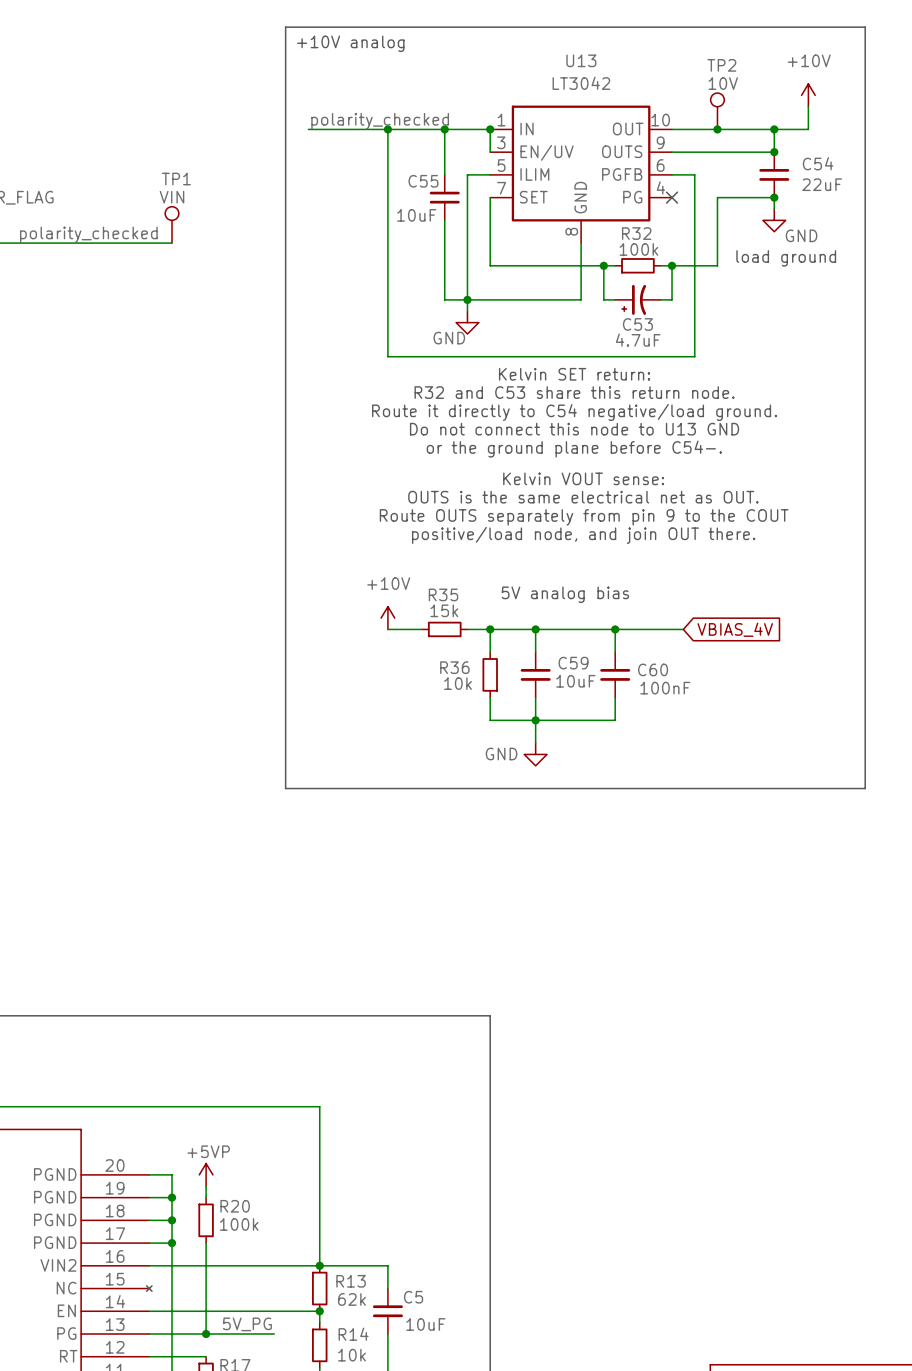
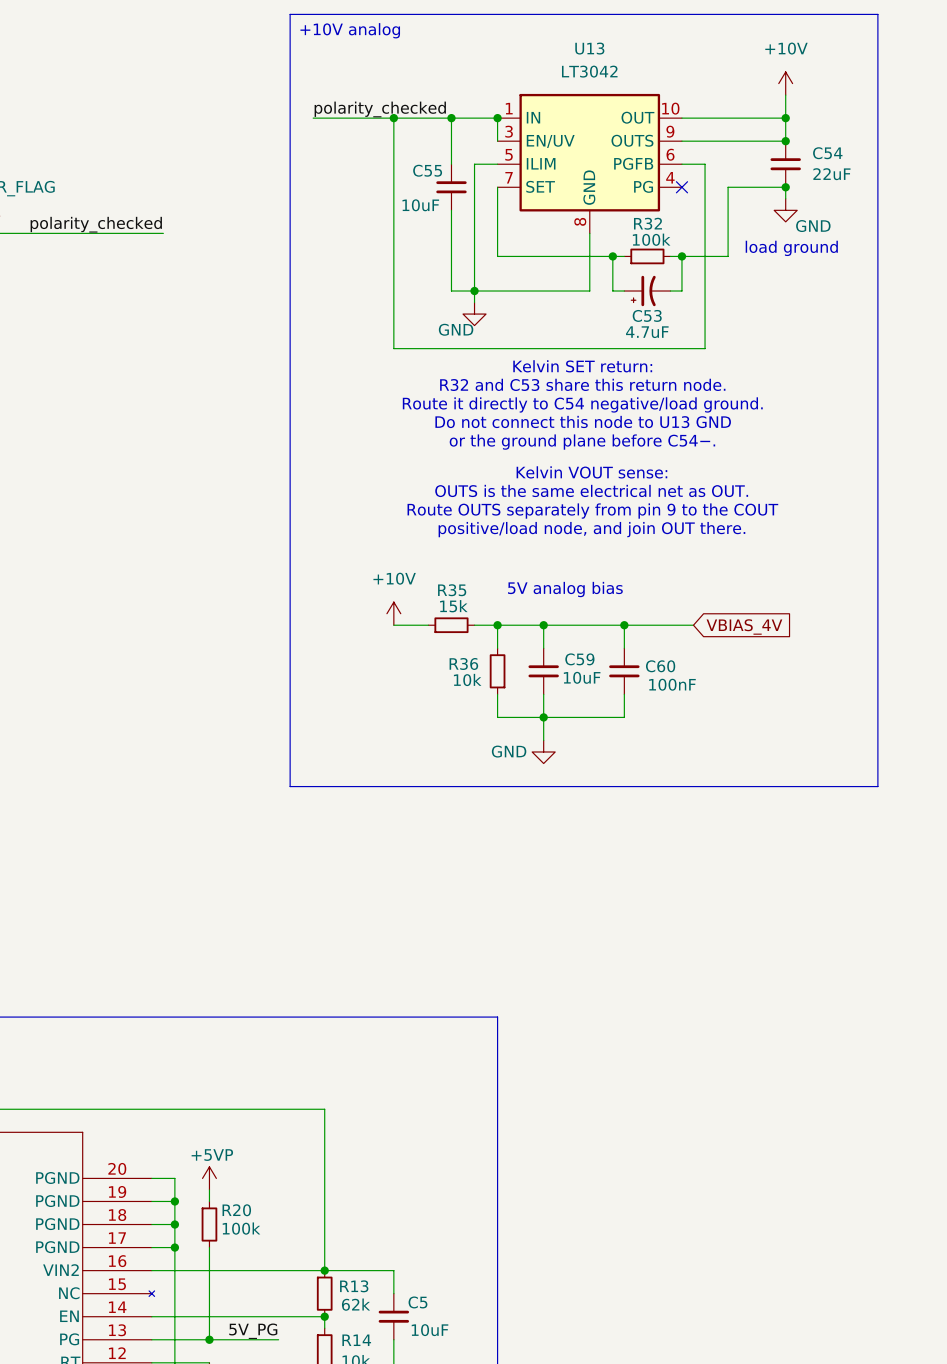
power symbol position: +10V (808, 95) -> +10V (785, 83)
wire: (808, 106) (808, 129) (774, 129) -> (785, 95) (785, 118)
TP2: 10V (717, 111) -> none
junction: (717, 129) -> none
TP1: VIN (172, 224) -> none
wire: (160, 243) (172, 243) -> none

